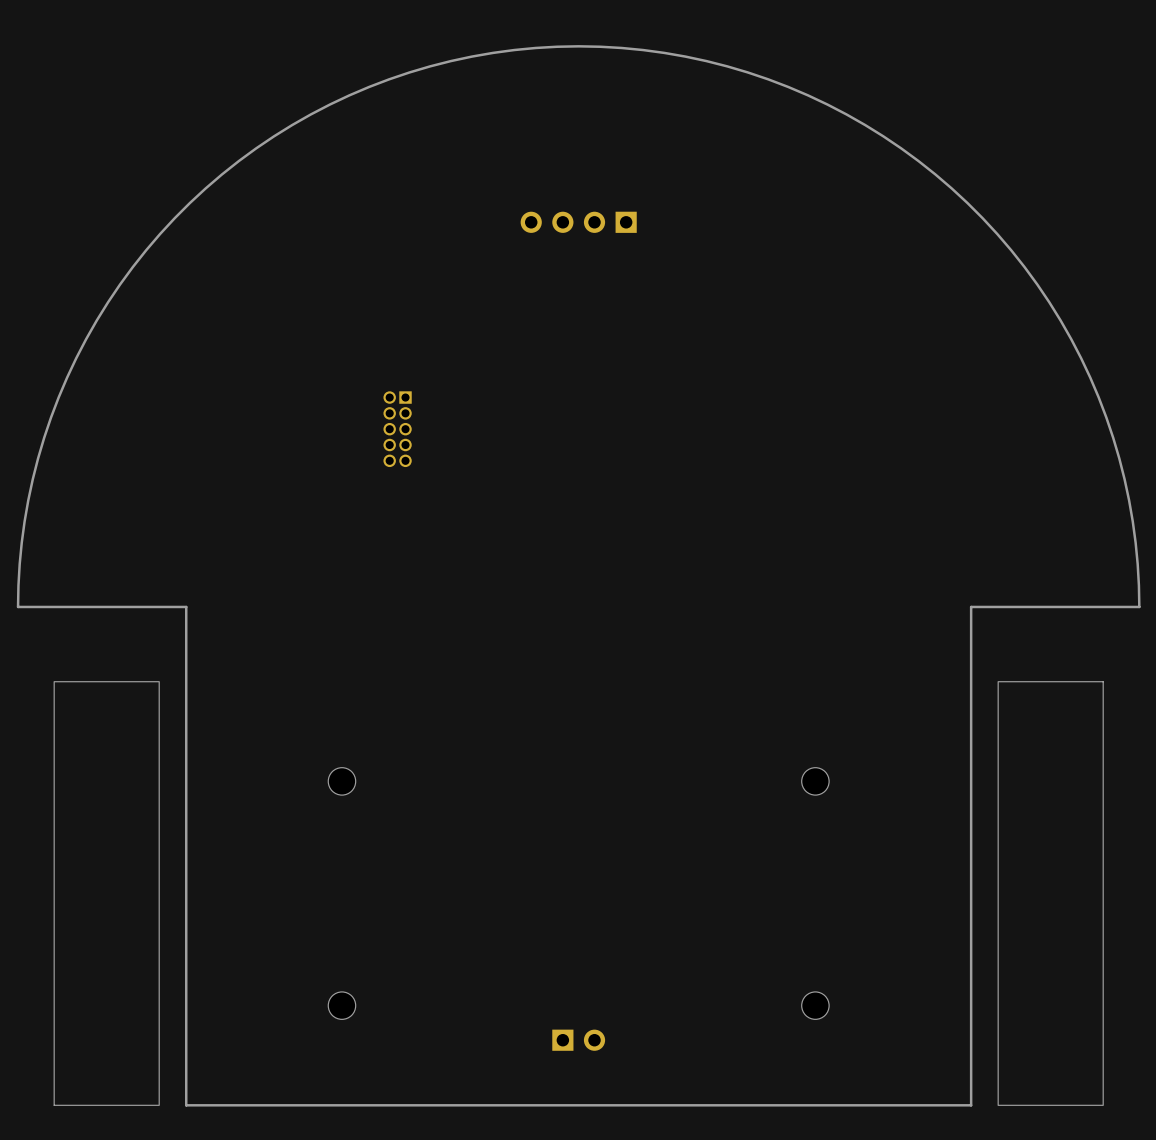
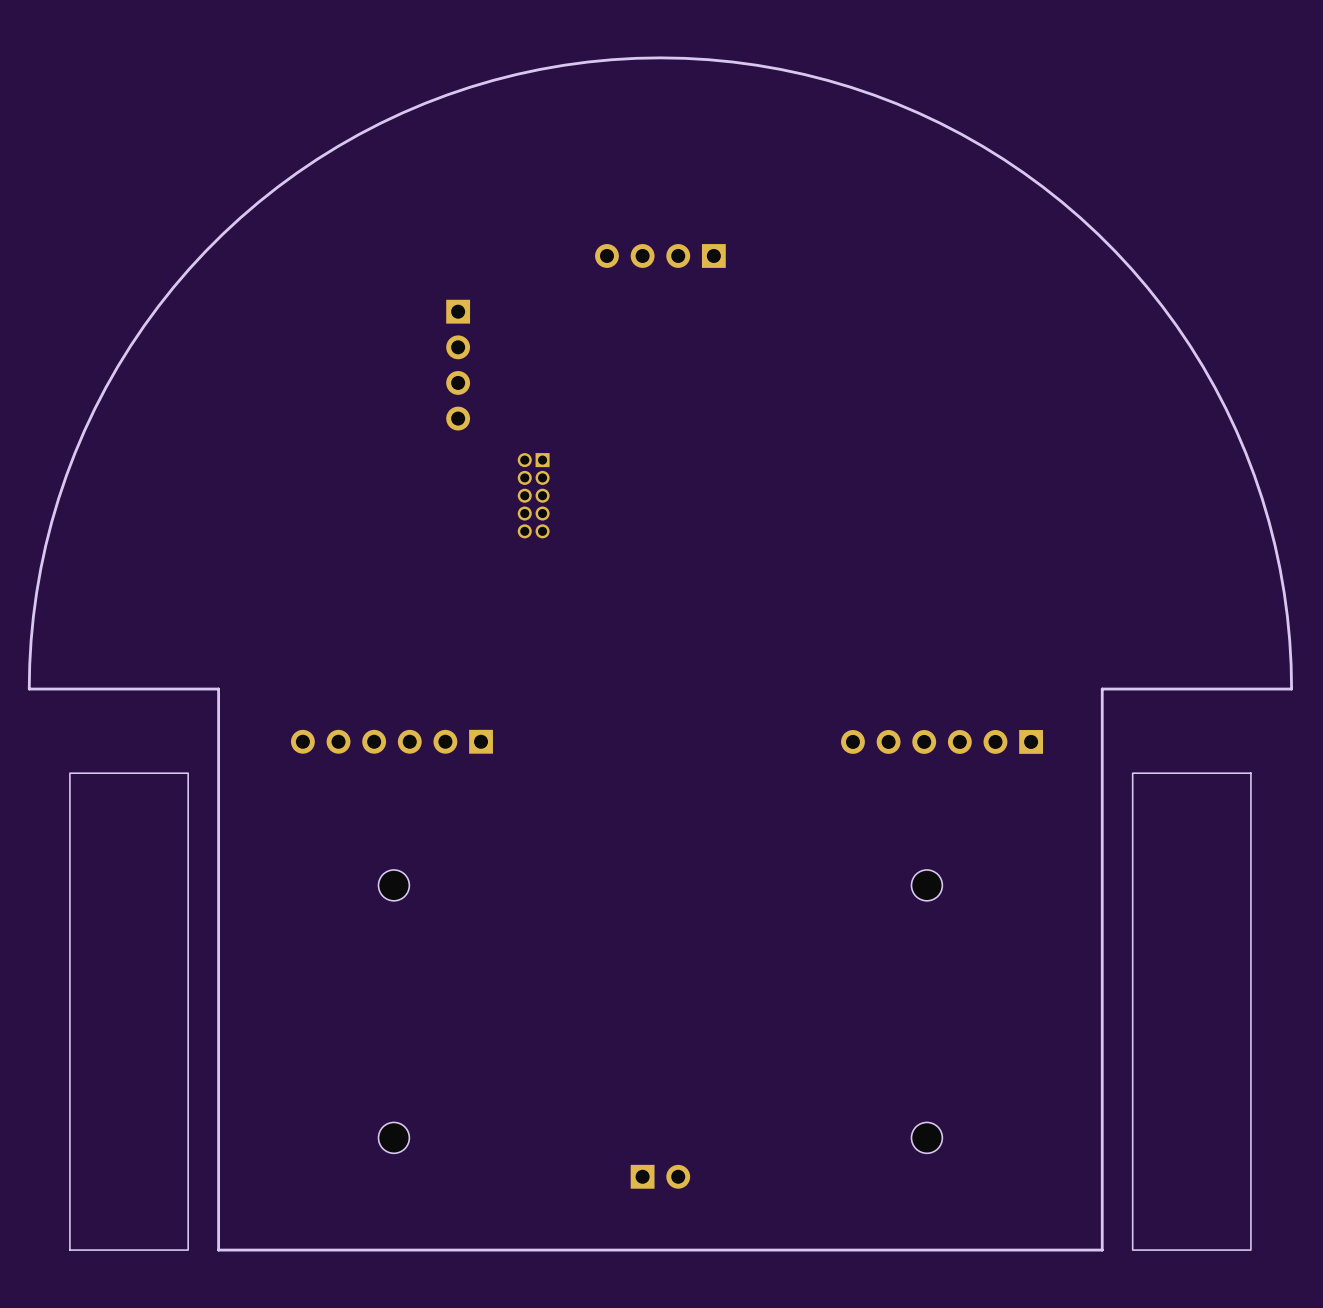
part: none -> (458, 365)
part position: (397, 429) -> (533, 495)
part: none -> (391, 741)
part: none -> (942, 741)

